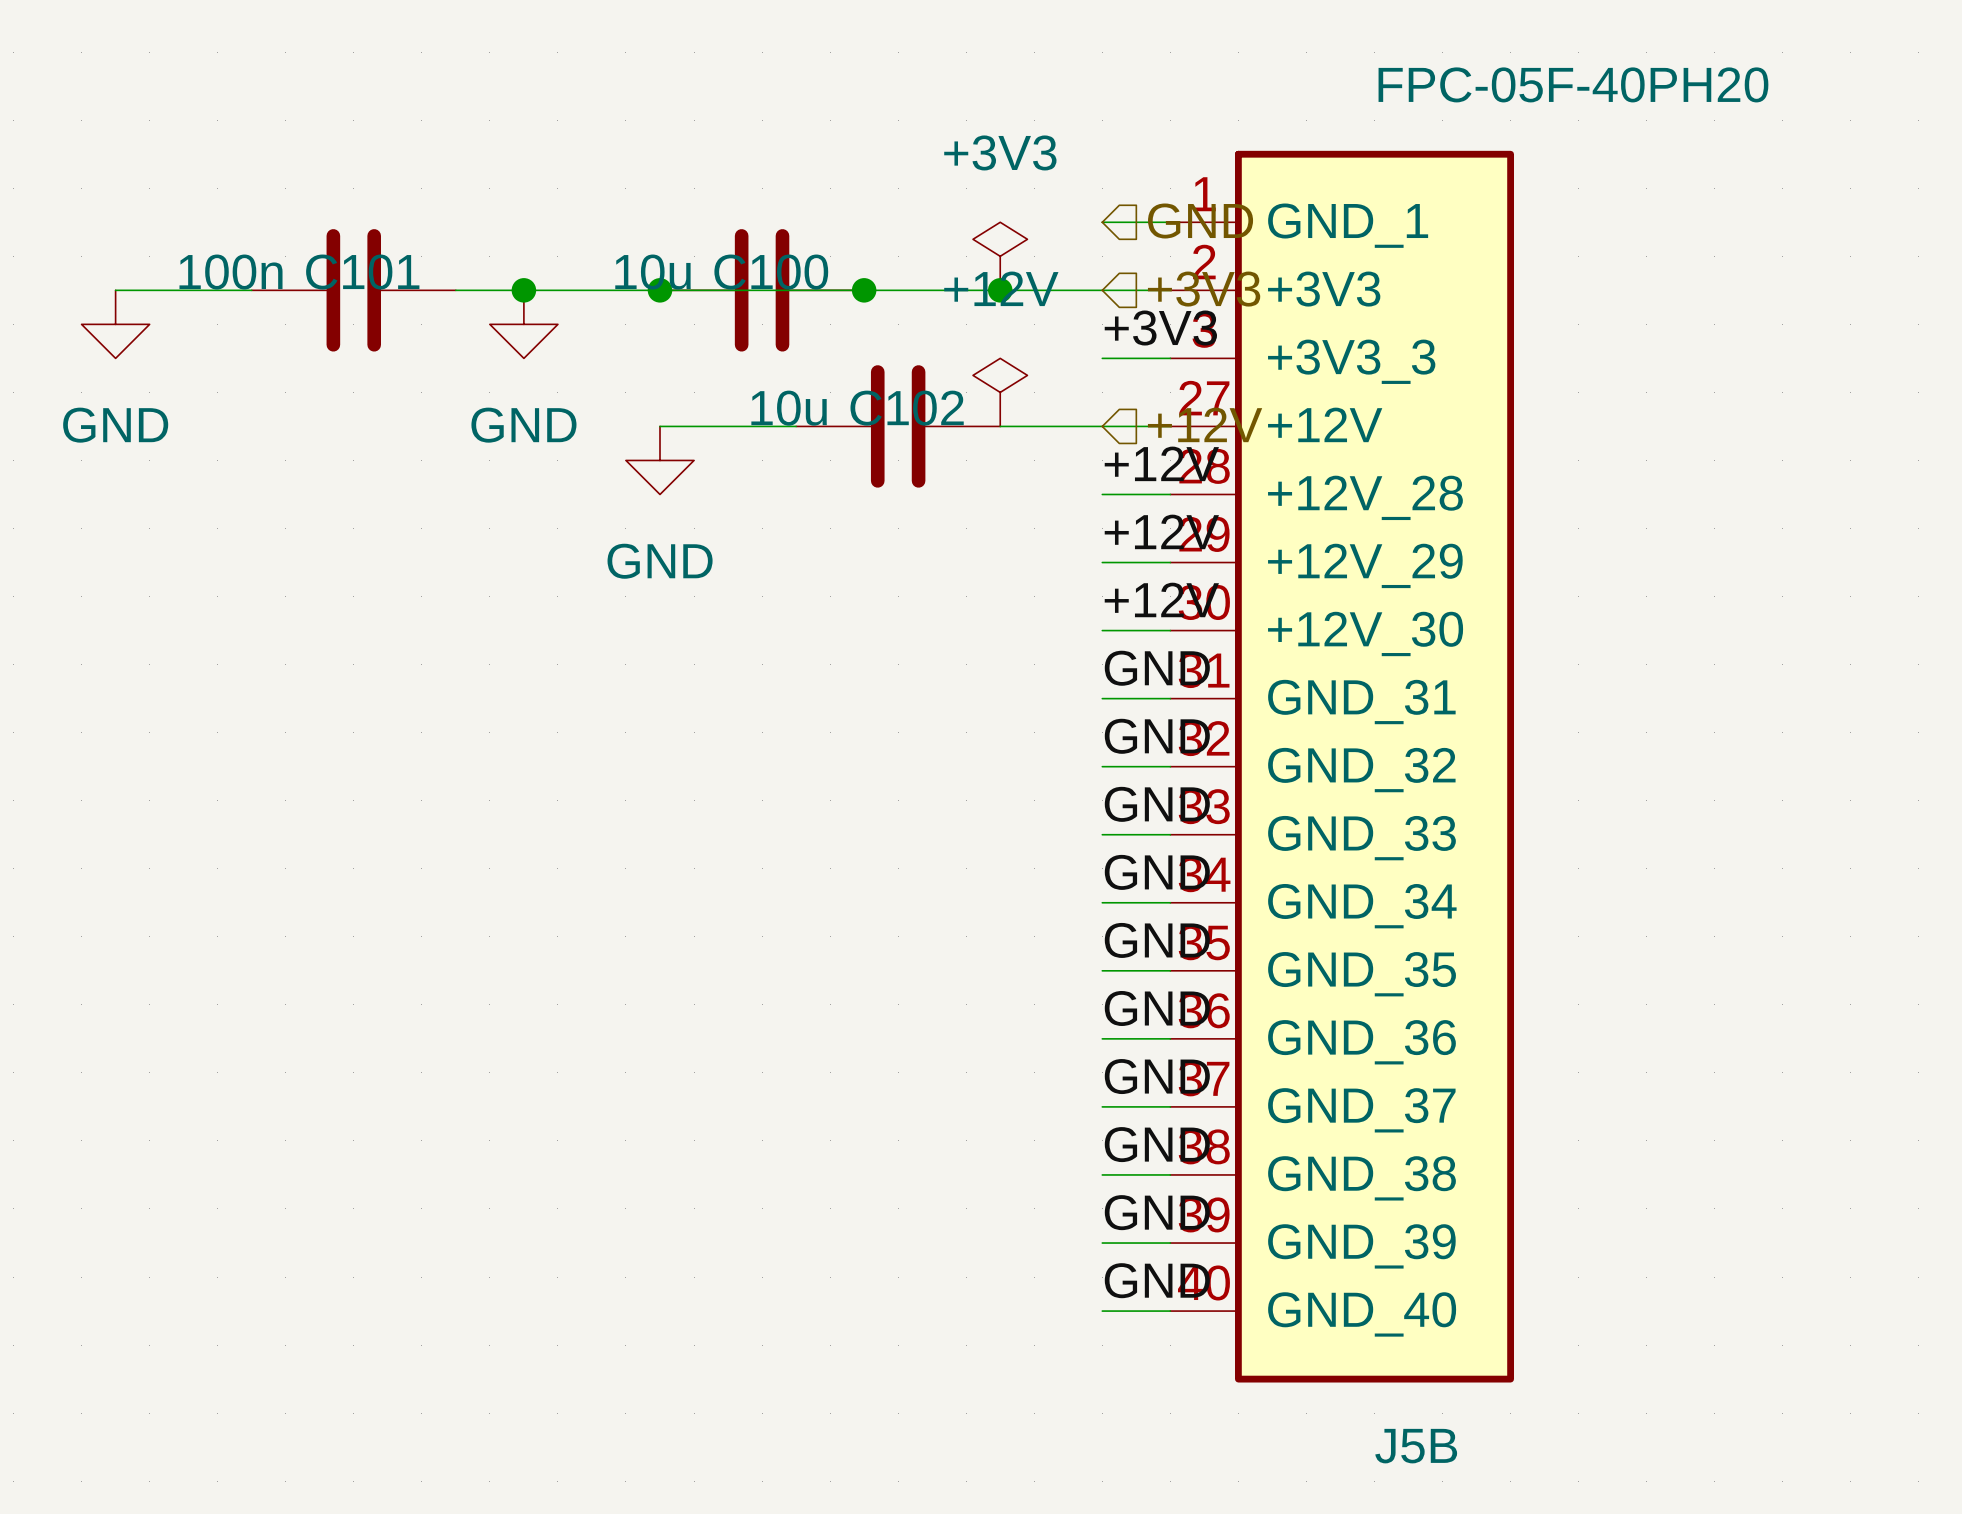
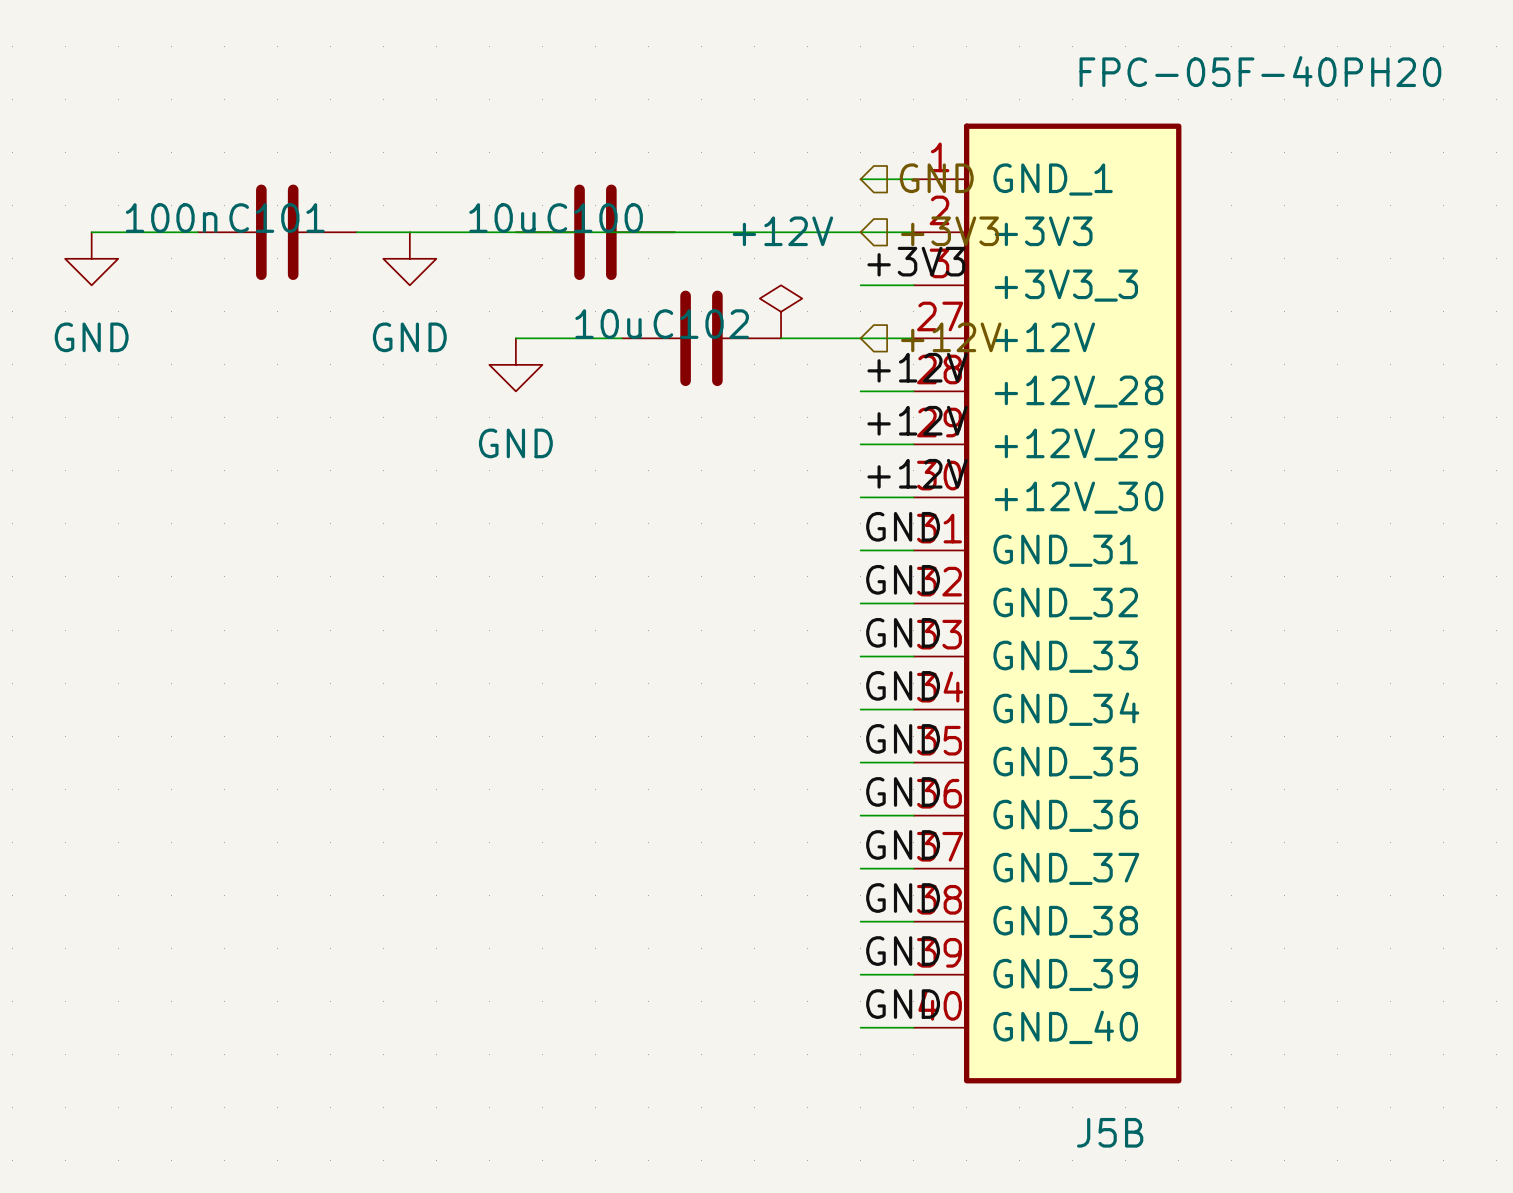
power symbol: +3V3 (1000, 256) -> none
junction: (523, 290) -> none
junction: (659, 290) -> none
junction: (864, 290) -> none
junction: (1000, 290) -> none

